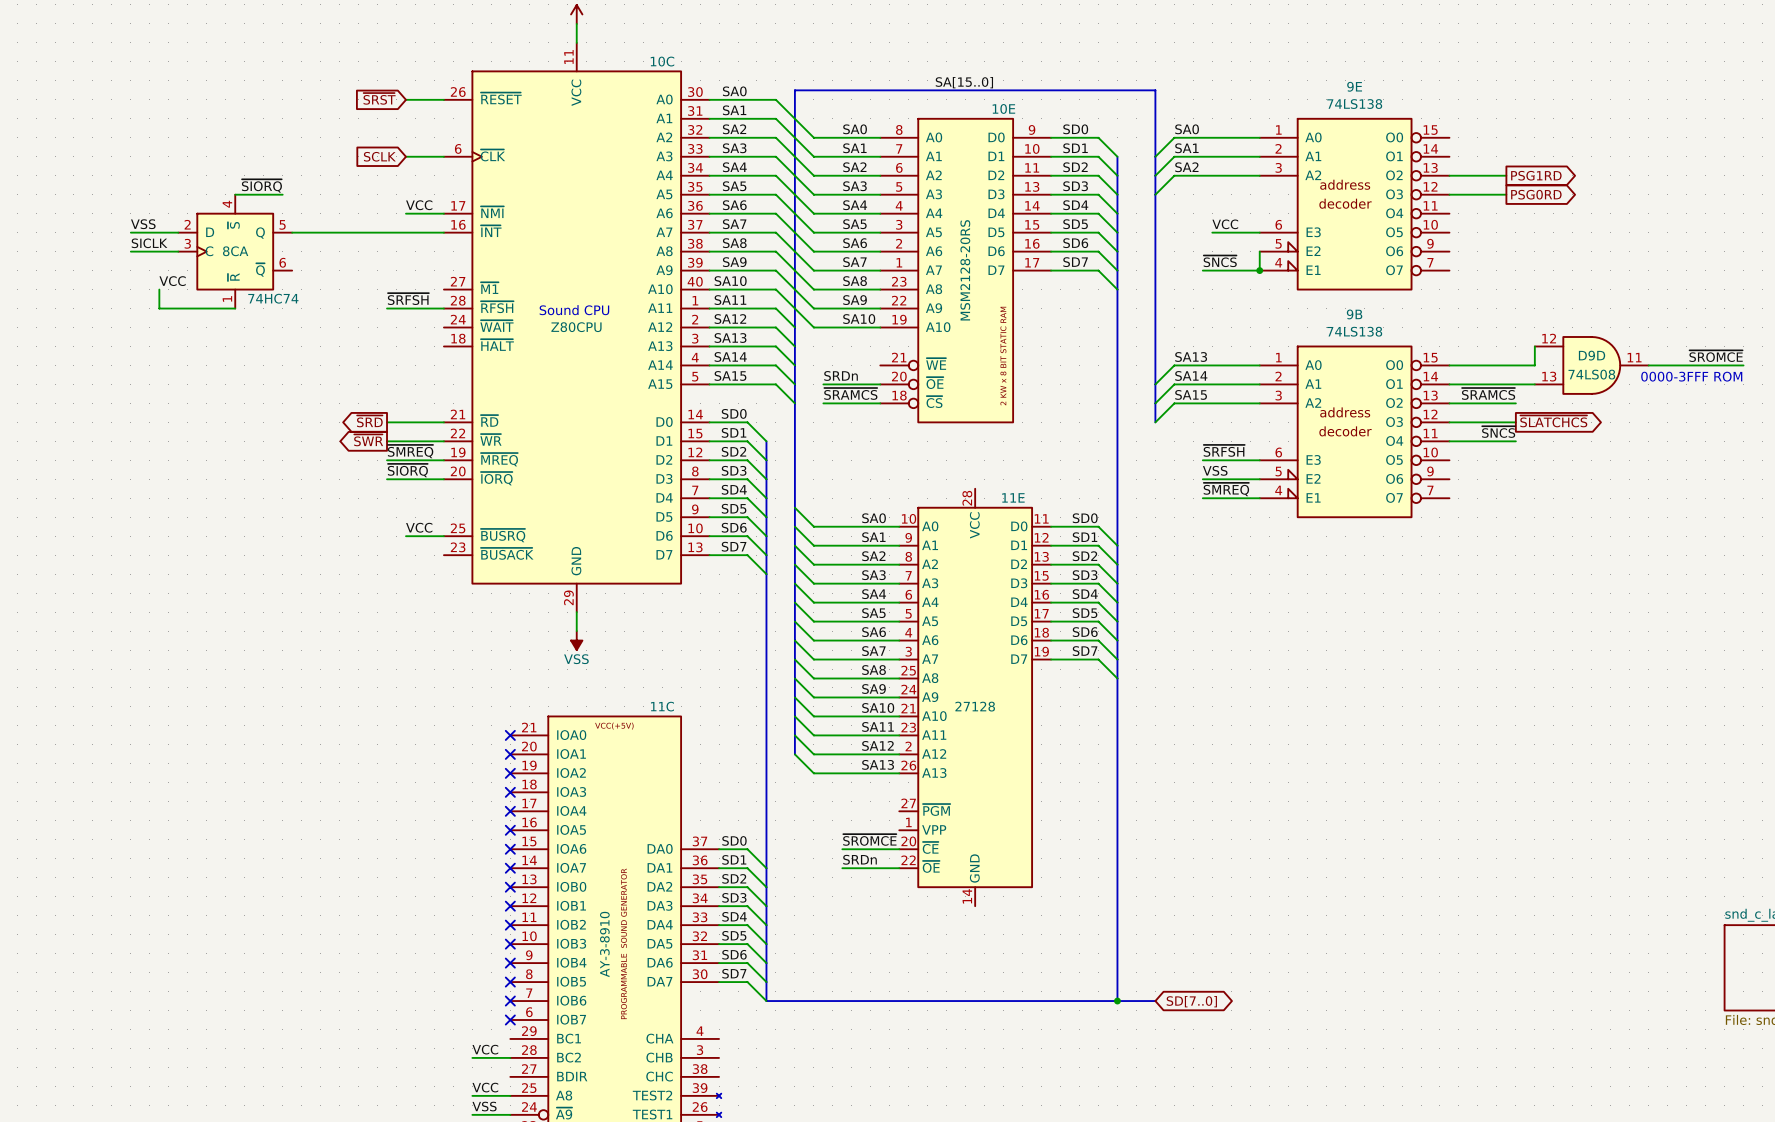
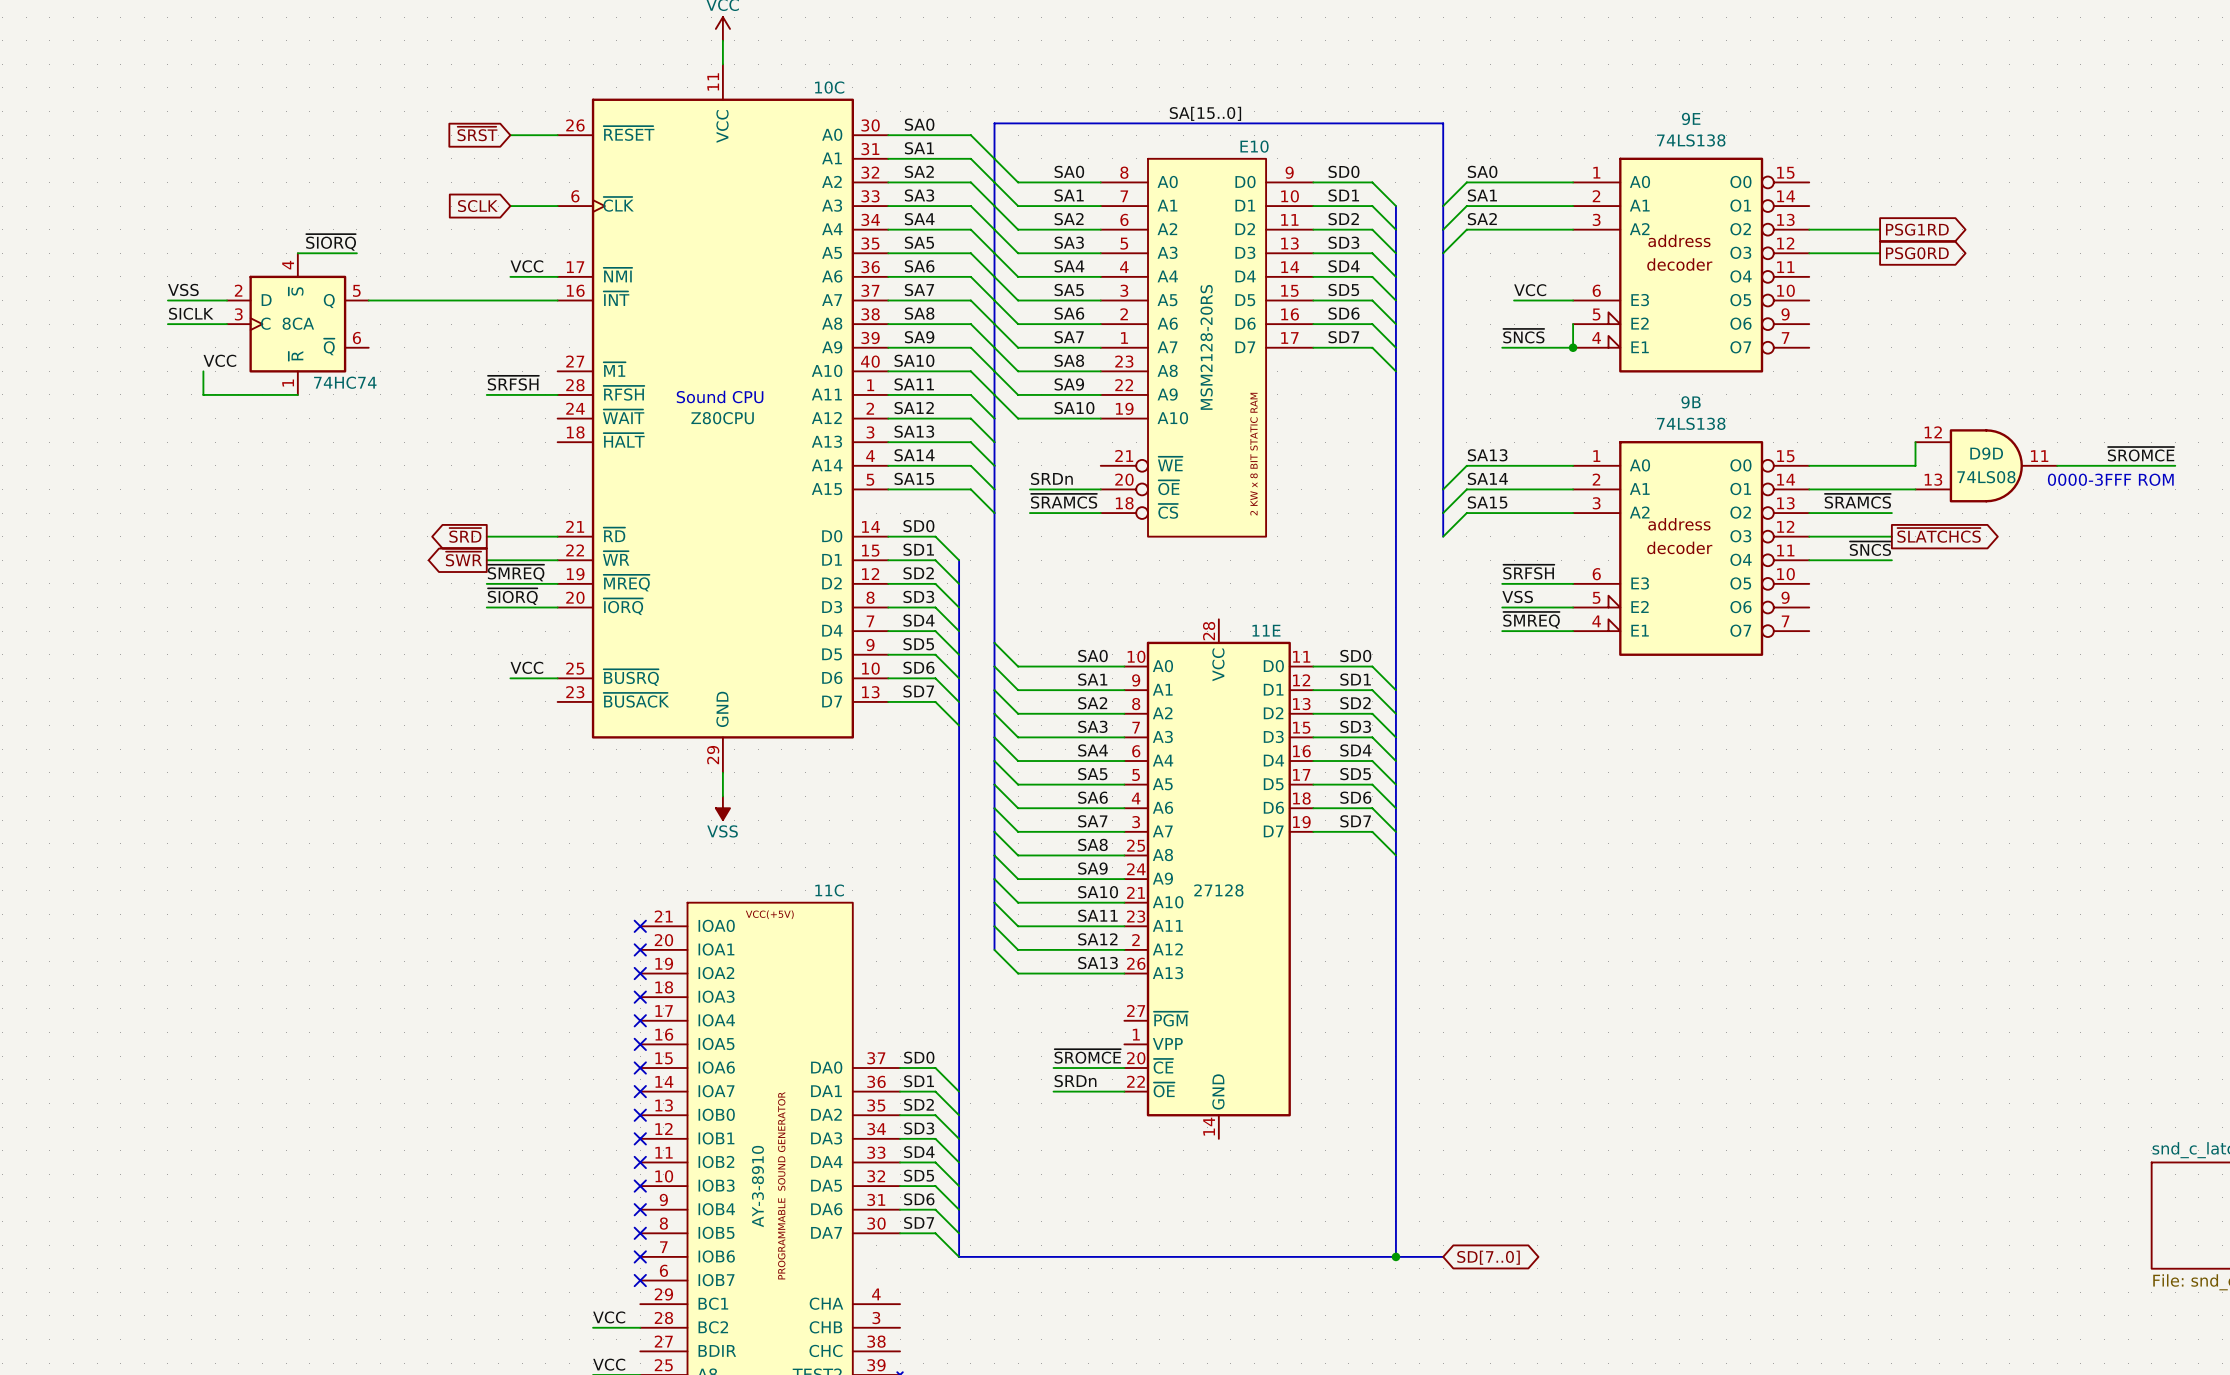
10E name: 10E (1003, 108) -> E10 (1254, 146)

